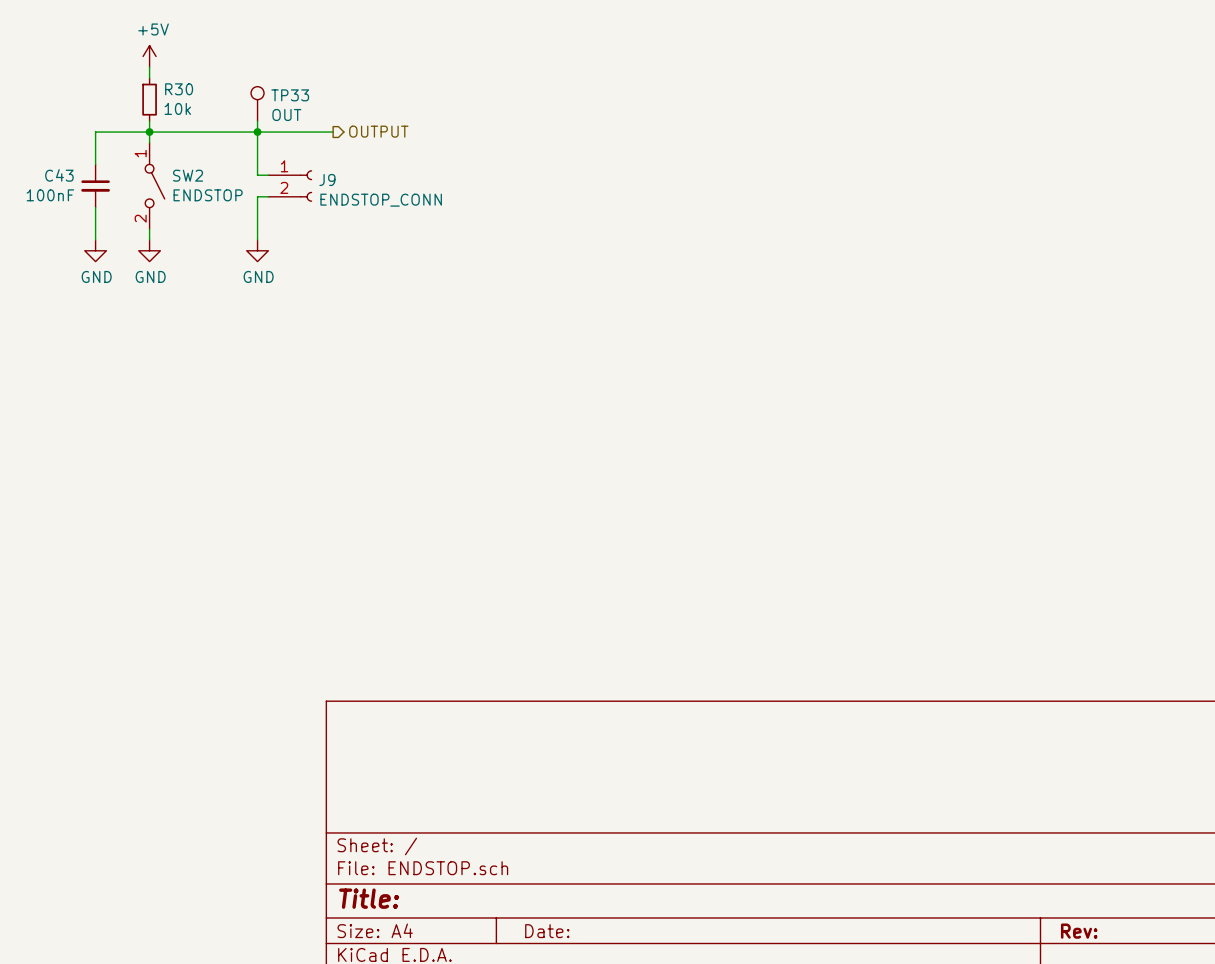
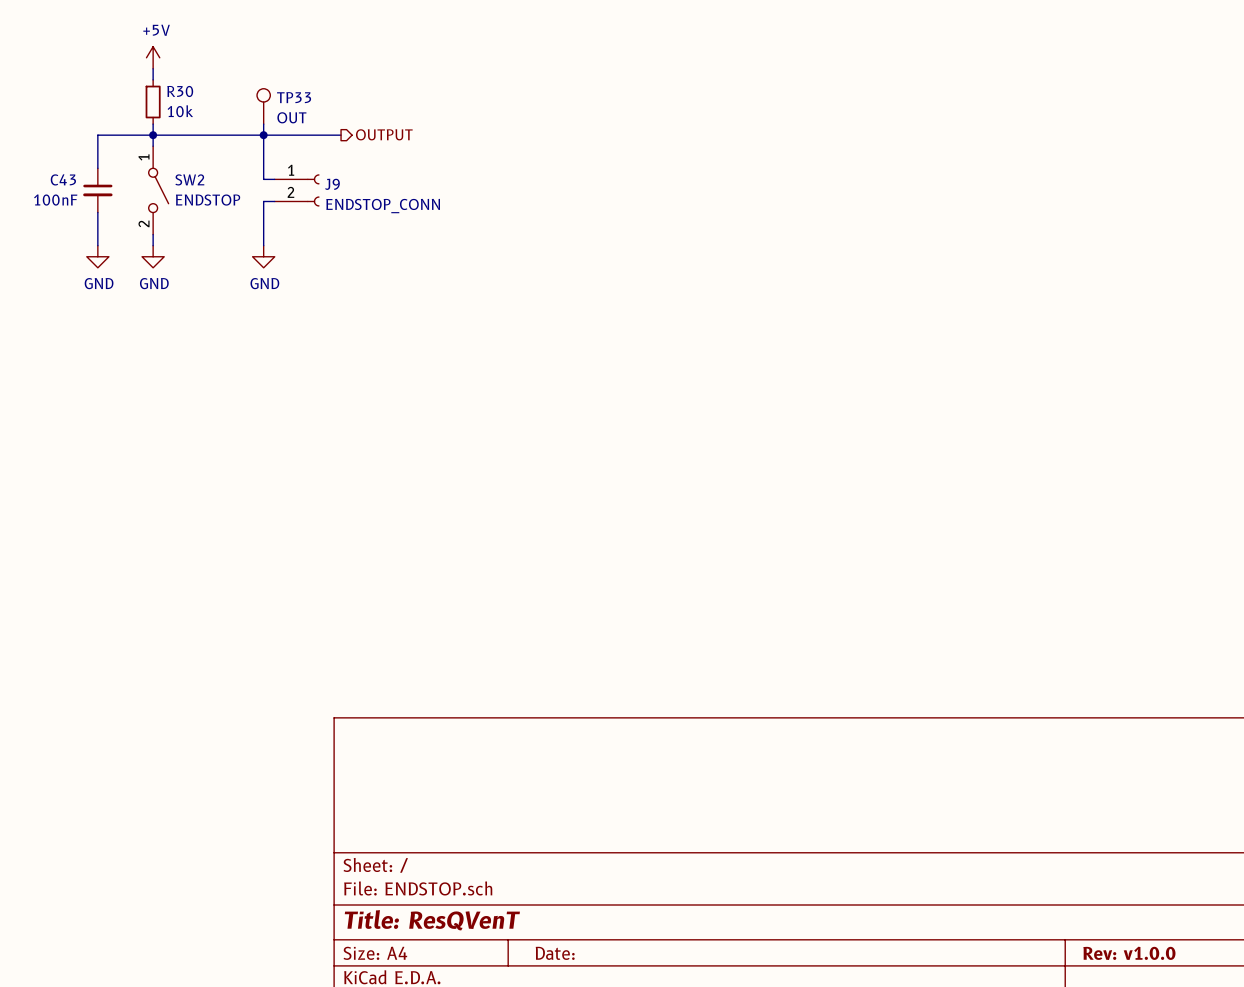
title block: Title: (369, 898) -> Title: ResQVenT (432, 920)
title block: Rev: (1079, 931) -> Rev: v1.0.0 (1129, 953)

